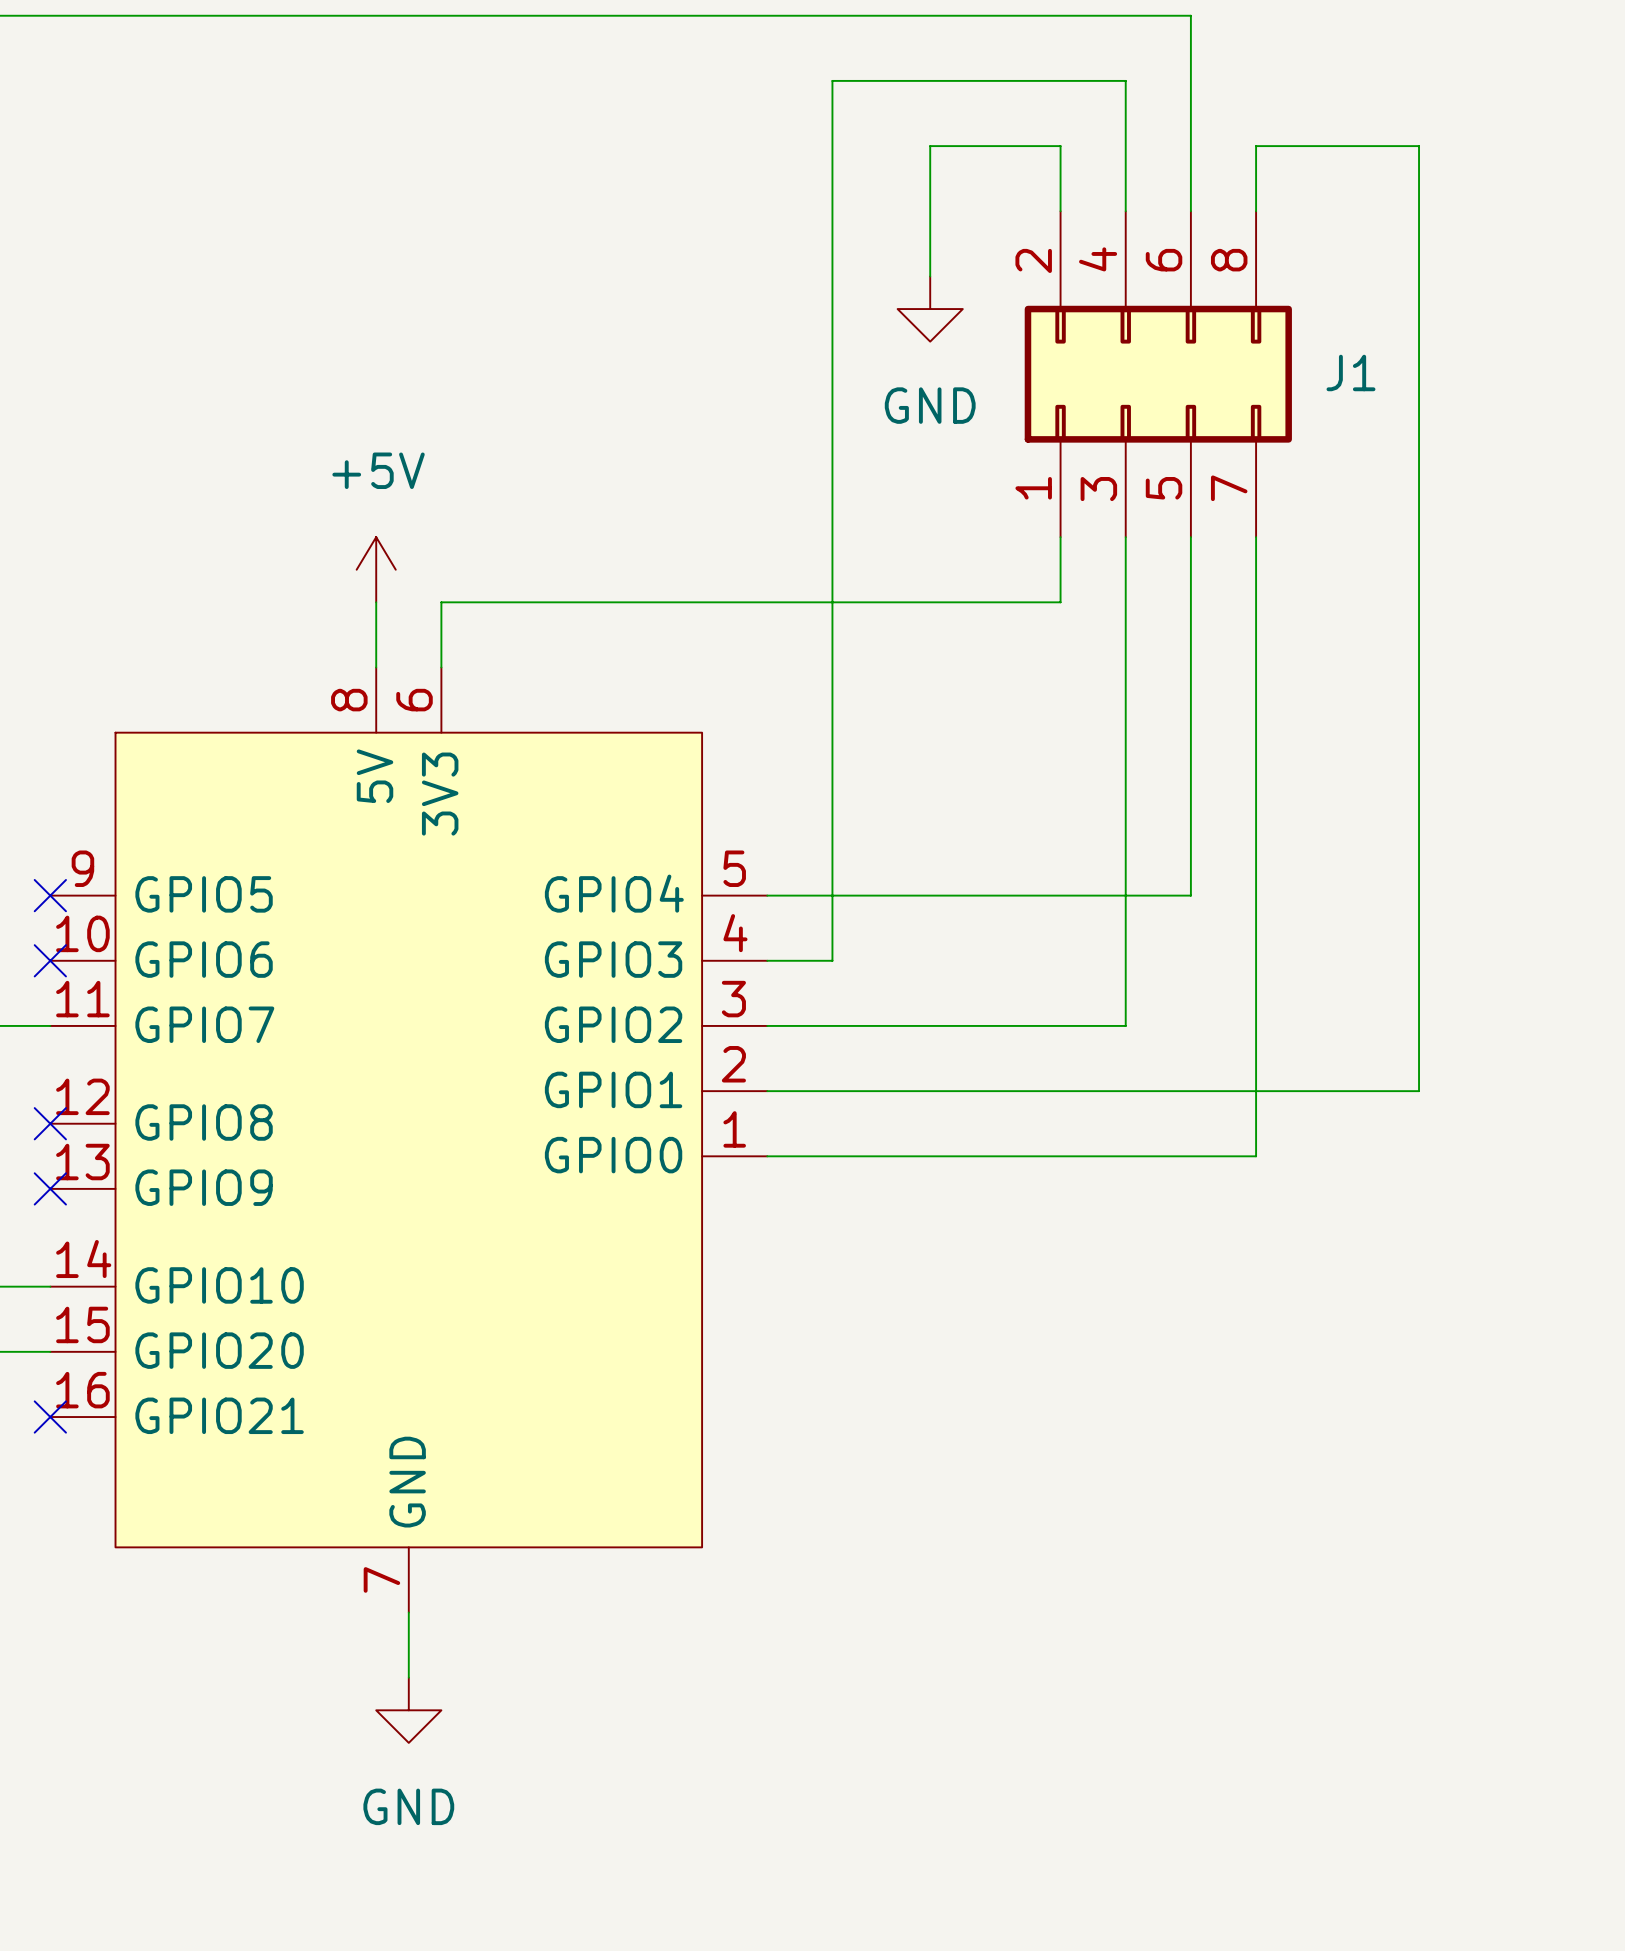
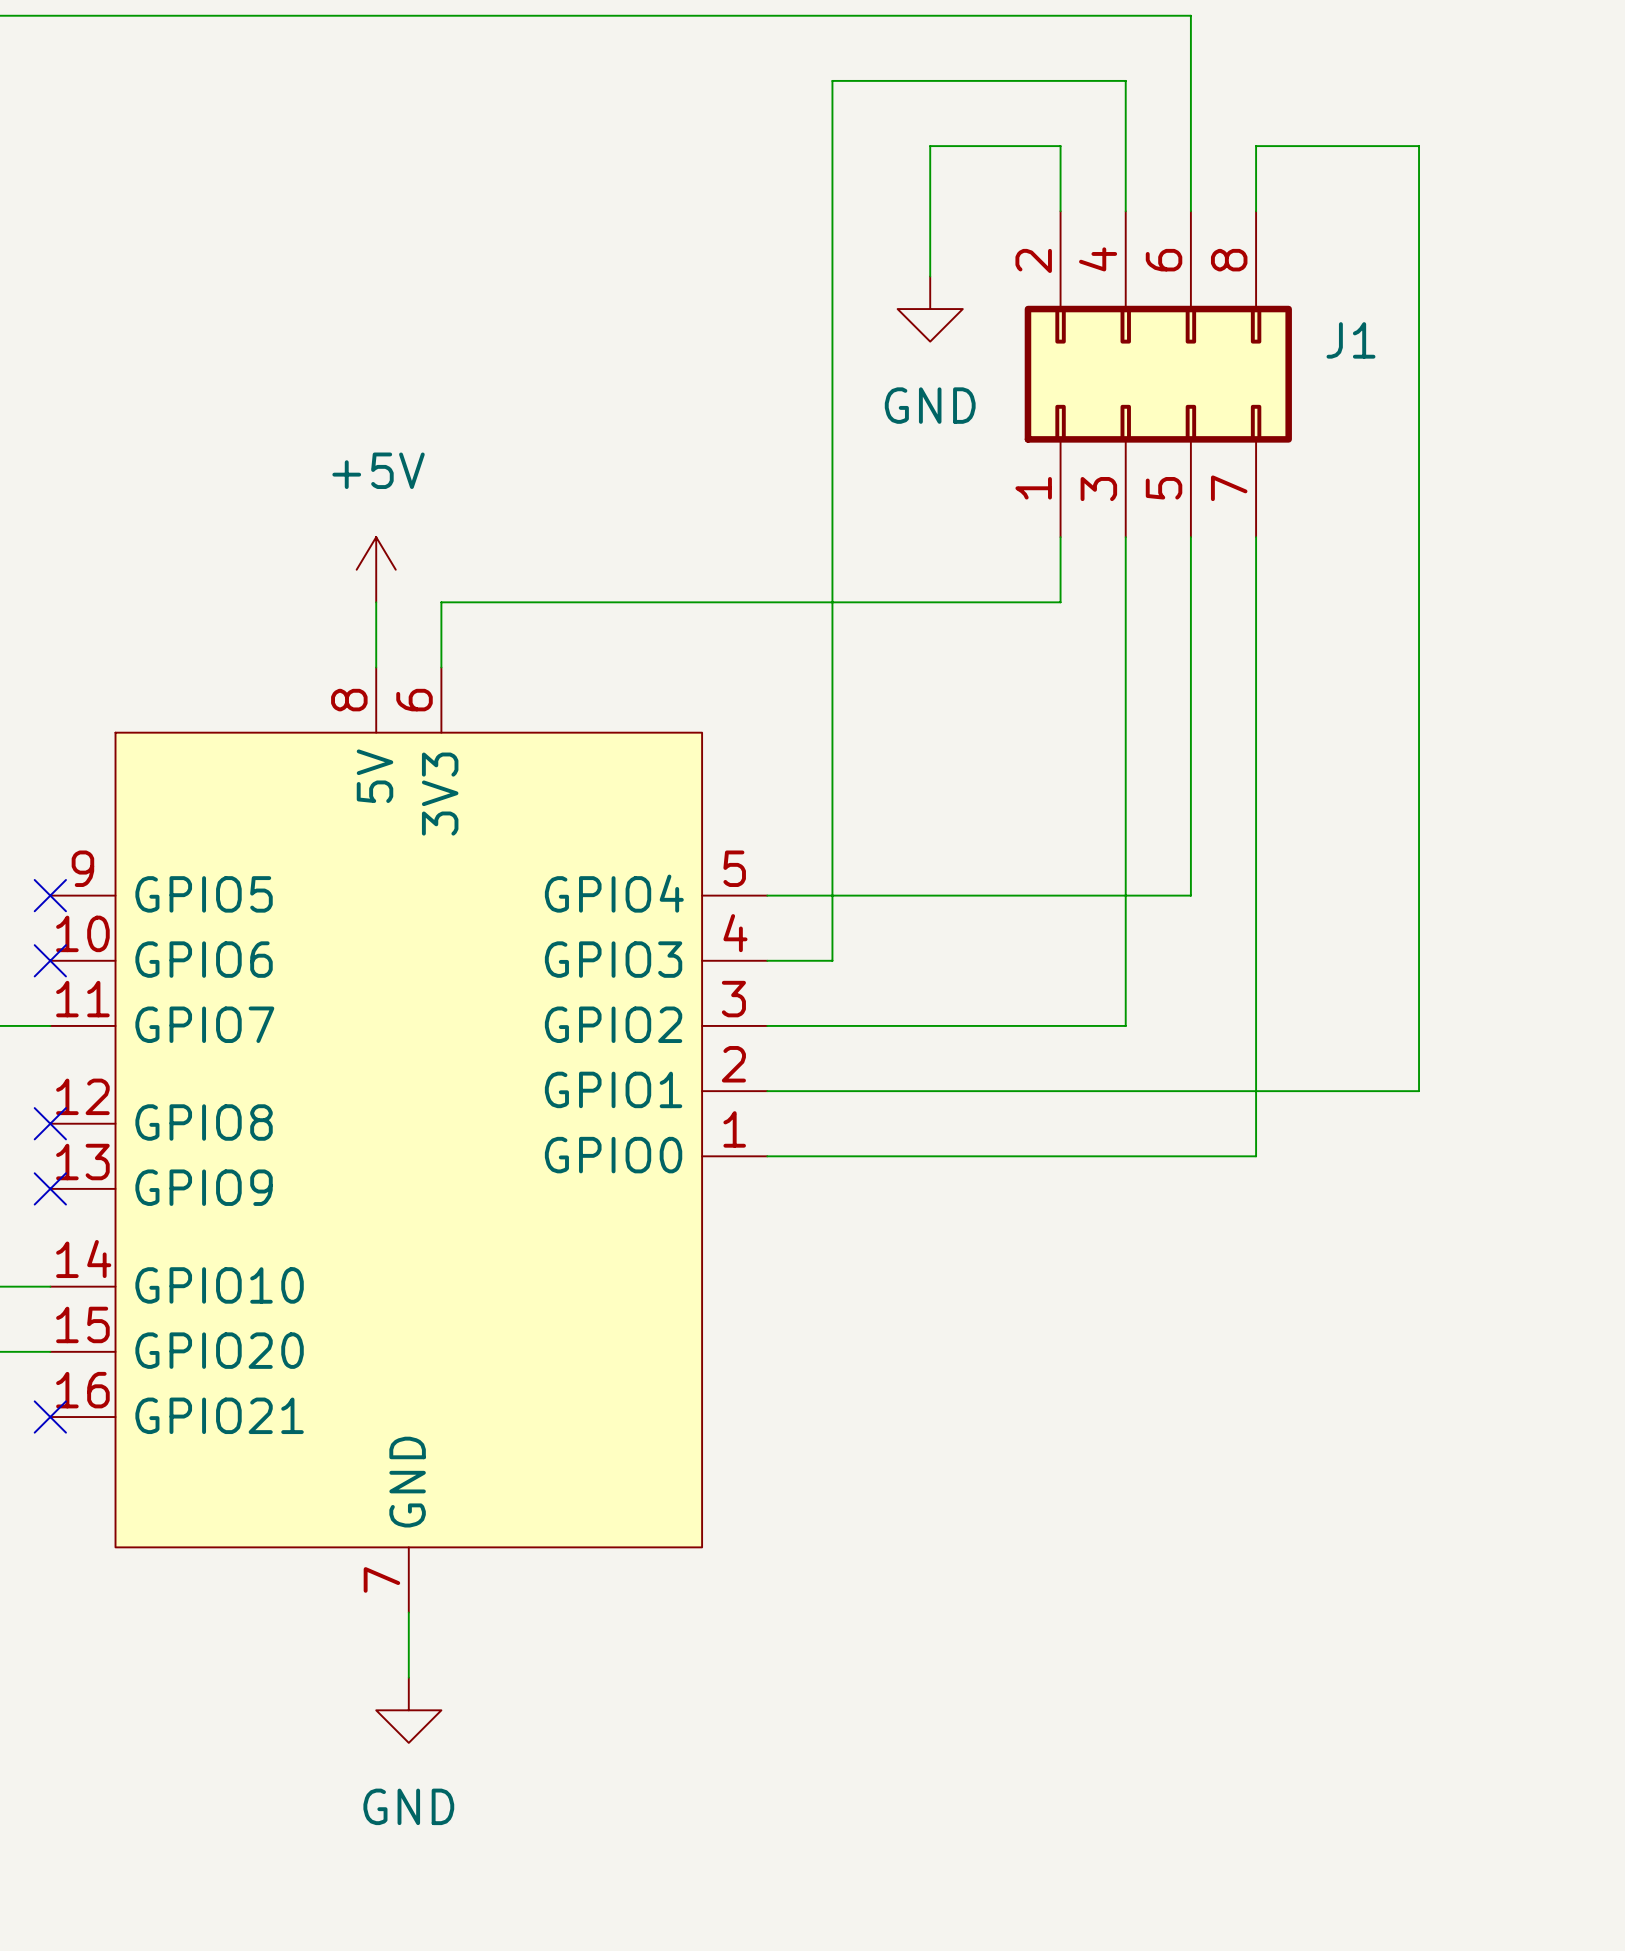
J1 name position: J1 (1350, 372) -> J1 (1350, 340)

